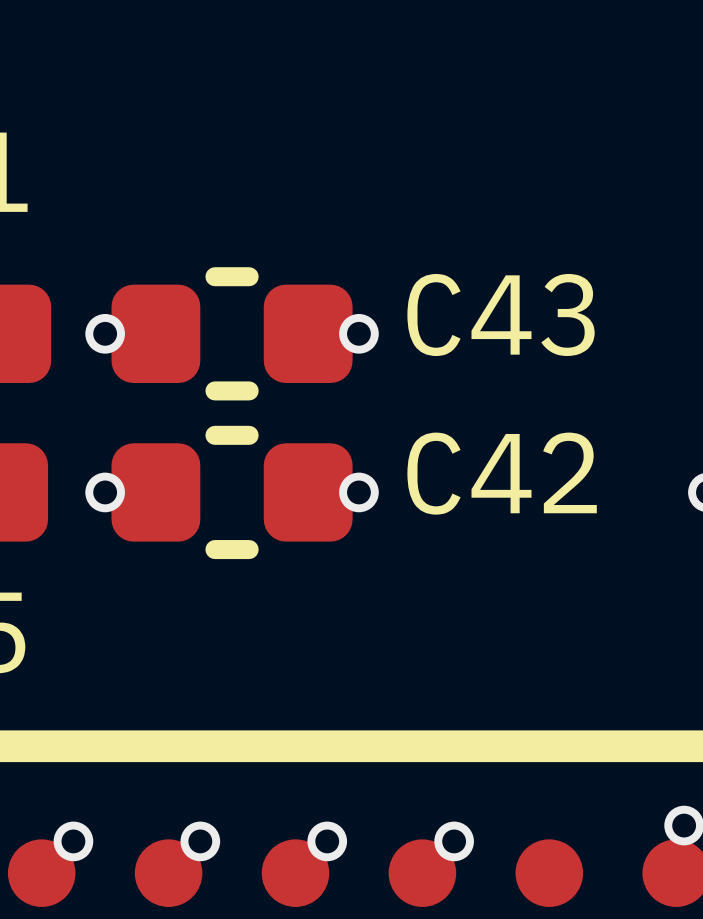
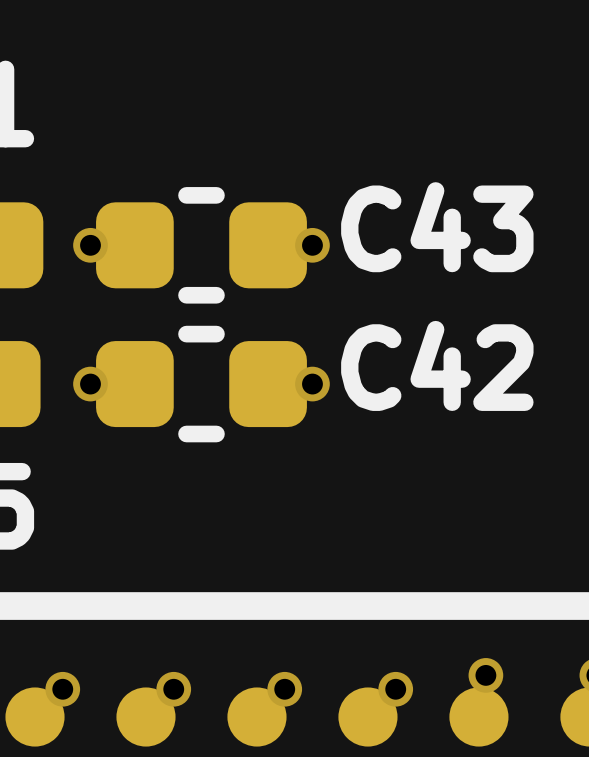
via: none -> (485, 675)

